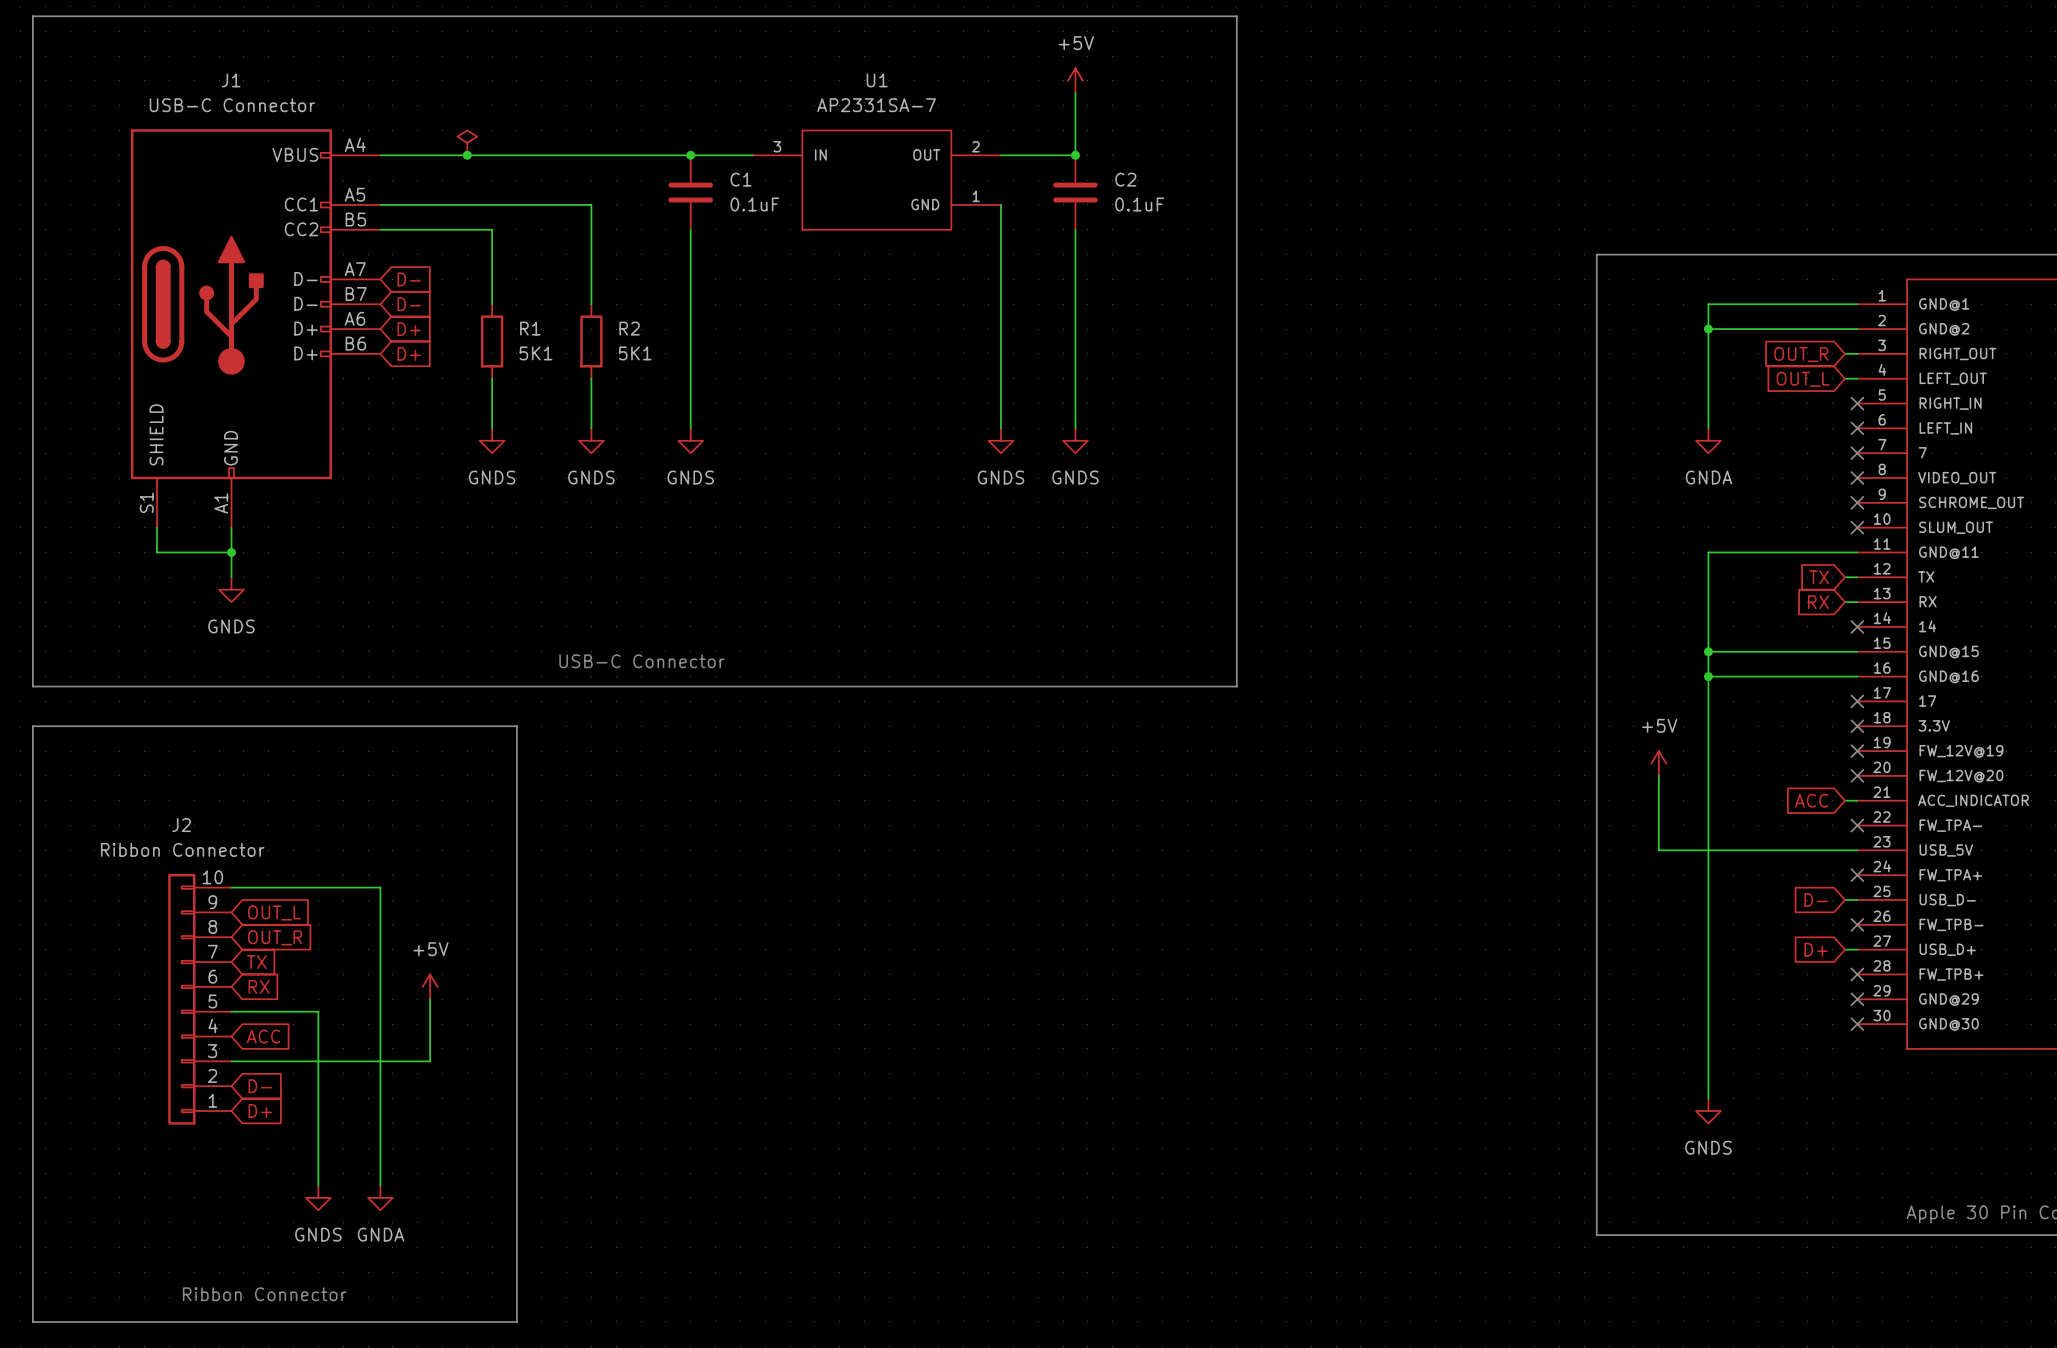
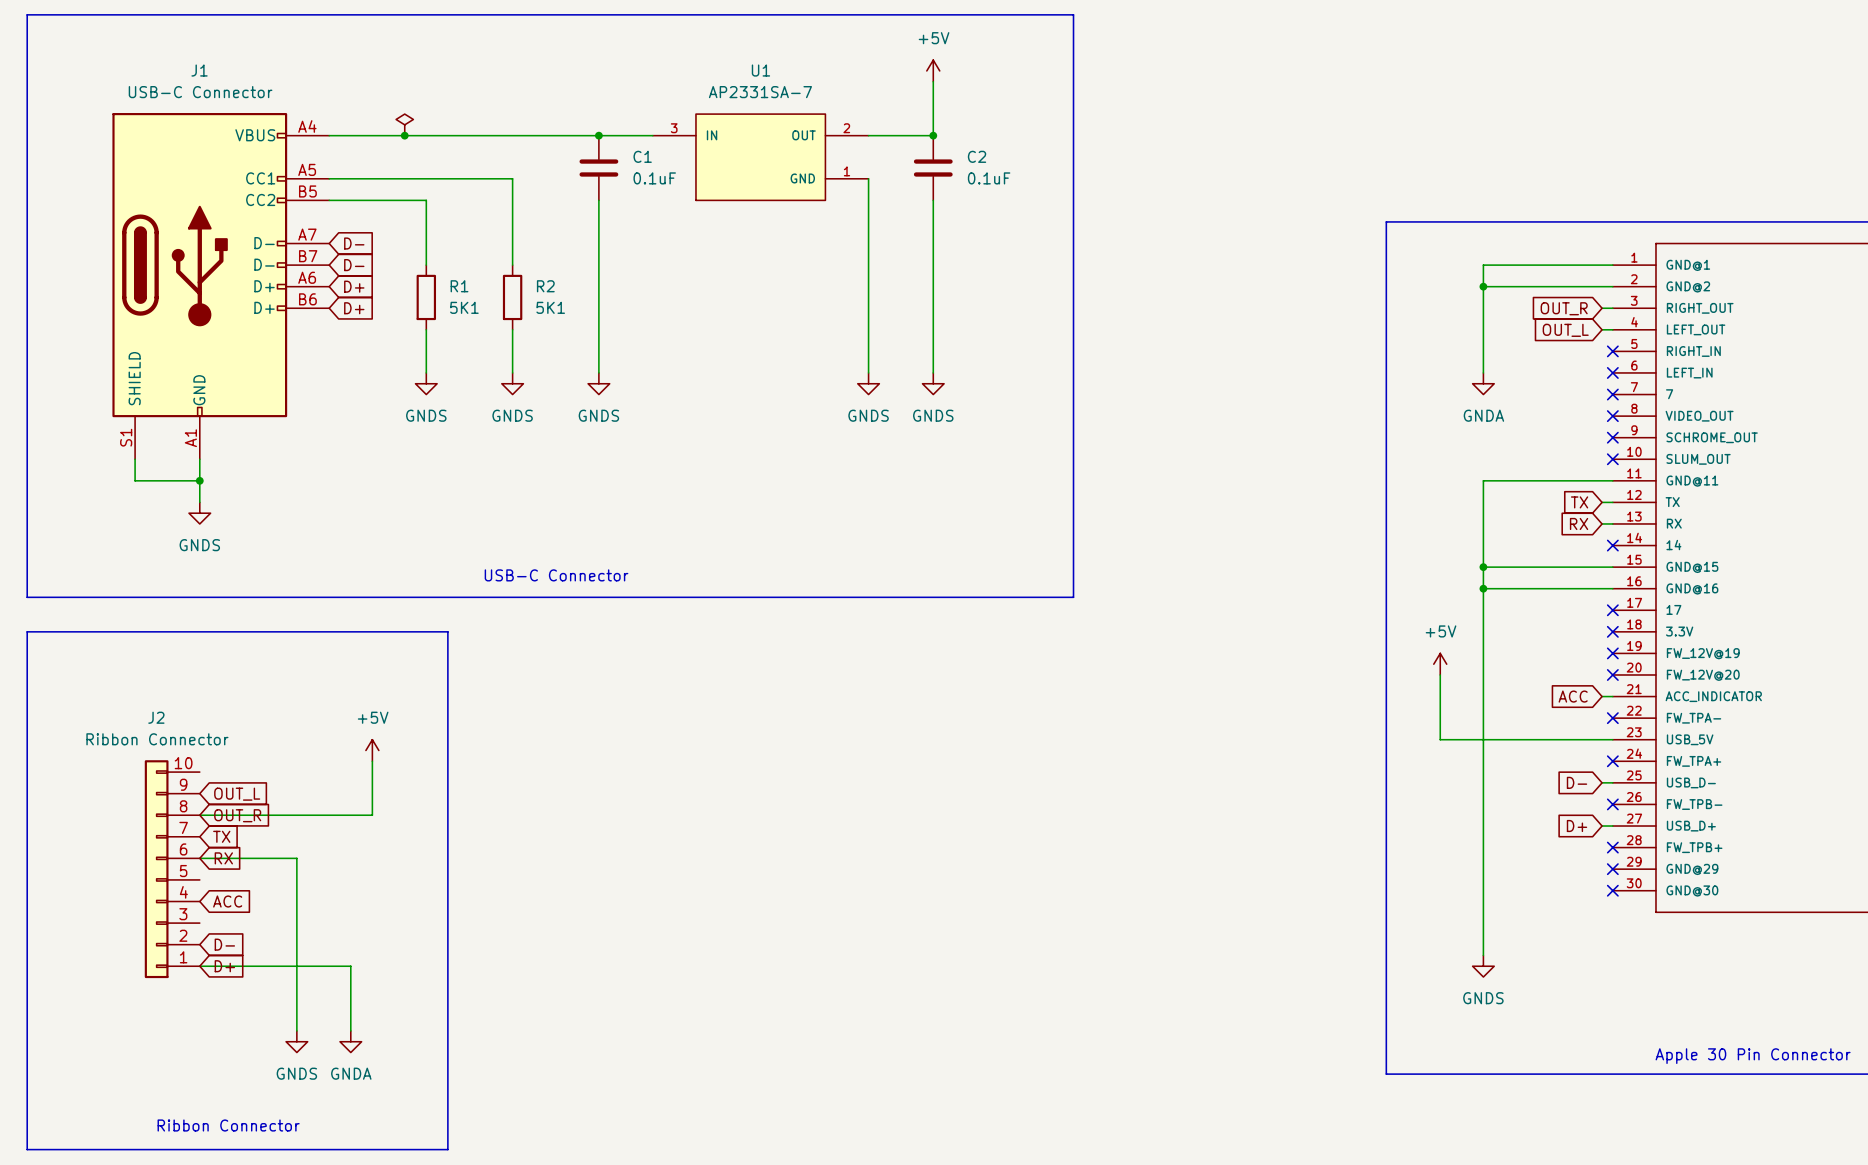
wire: (231, 887) (380, 887) (380, 1185) -> none
wire: none -> (199, 858) (296, 858) (296, 1030)
power symbol position: +5V (430, 986) -> +5V (372, 750)
wire: (430, 999) (430, 1061) (231, 1061) -> (372, 761) (372, 815) (199, 815)
wire: (231, 1011) (318, 1011) (318, 1185) -> none
wire: none -> (199, 966) (350, 966) (350, 1030)
power symbol position: GNDS (318, 1197) -> GNDS (296, 1041)
power symbol position: GNDA (380, 1197) -> GNDA (350, 1041)

